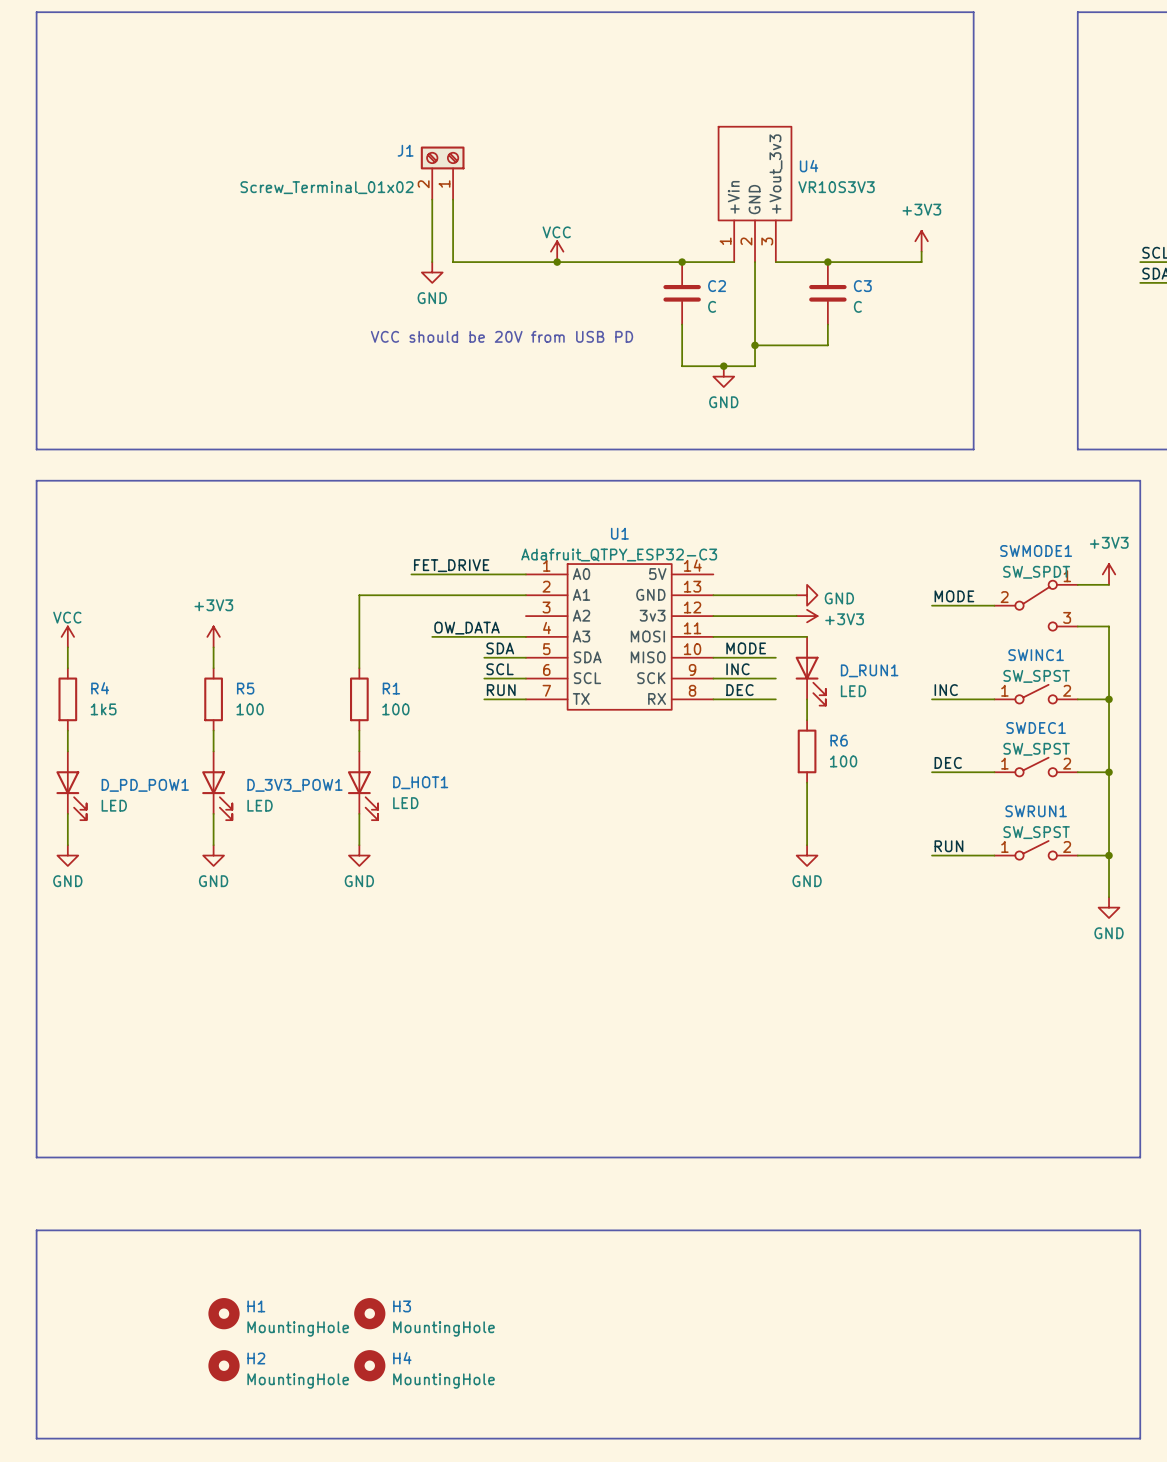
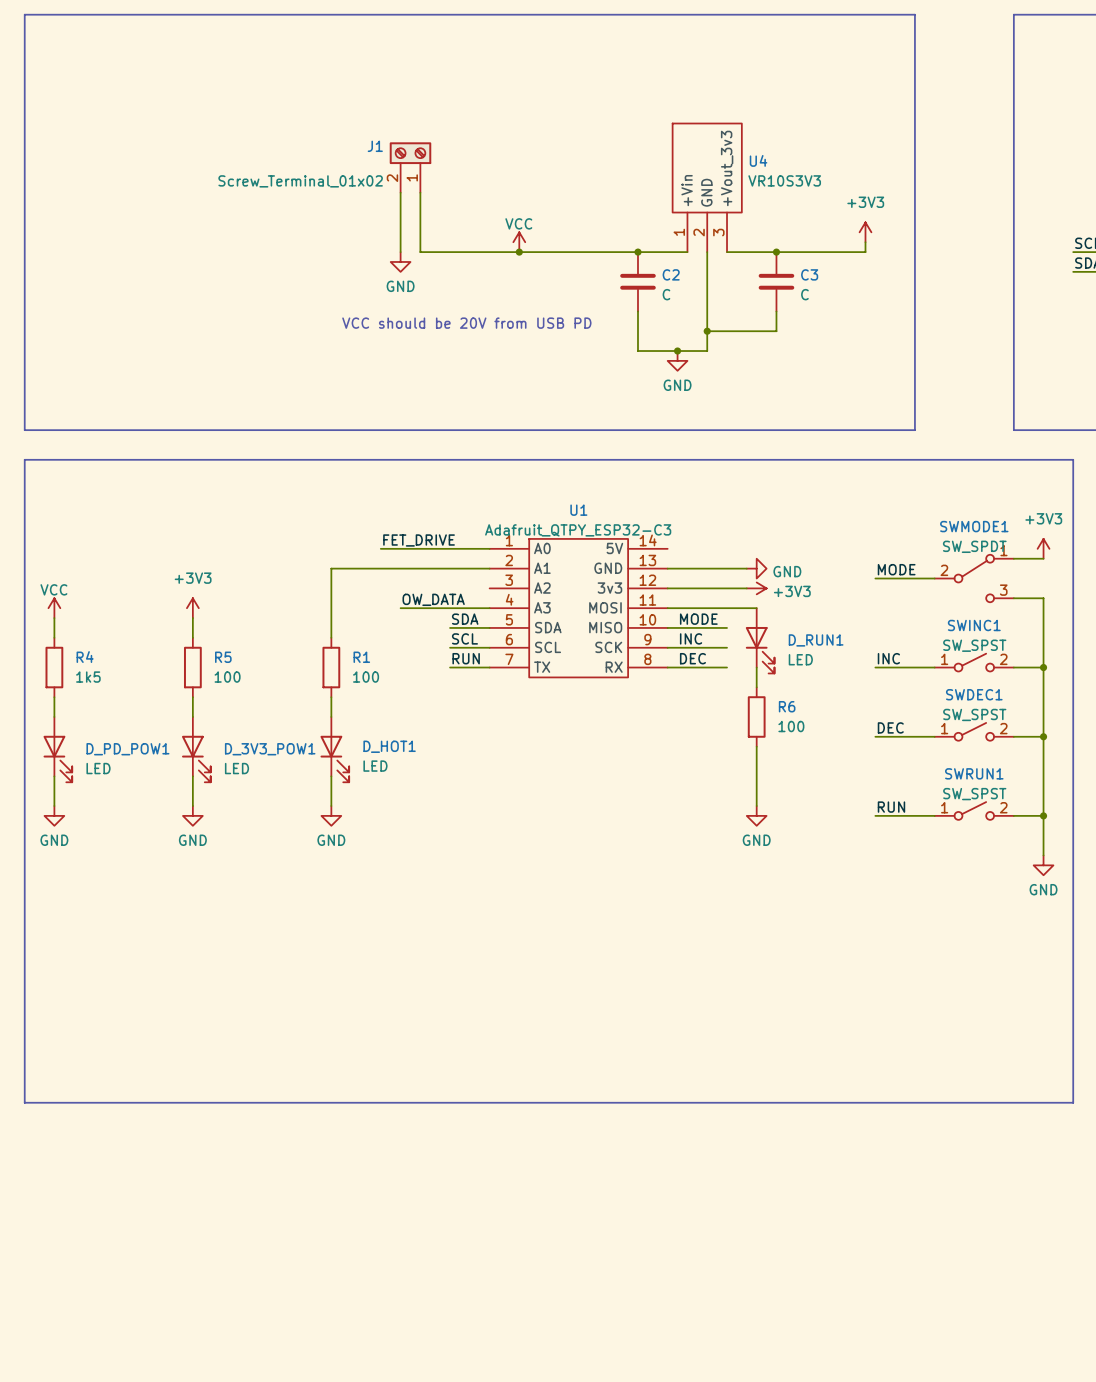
line: (36, 1230) (36, 1438) (1140, 1438) (1140, 1230) (36, 1230) -> none
H1: MountingHole (224, 1313) -> none
H3: MountingHole (369, 1313) -> none
H2: MountingHole (224, 1365) -> none
H4: MountingHole (369, 1365) -> none

